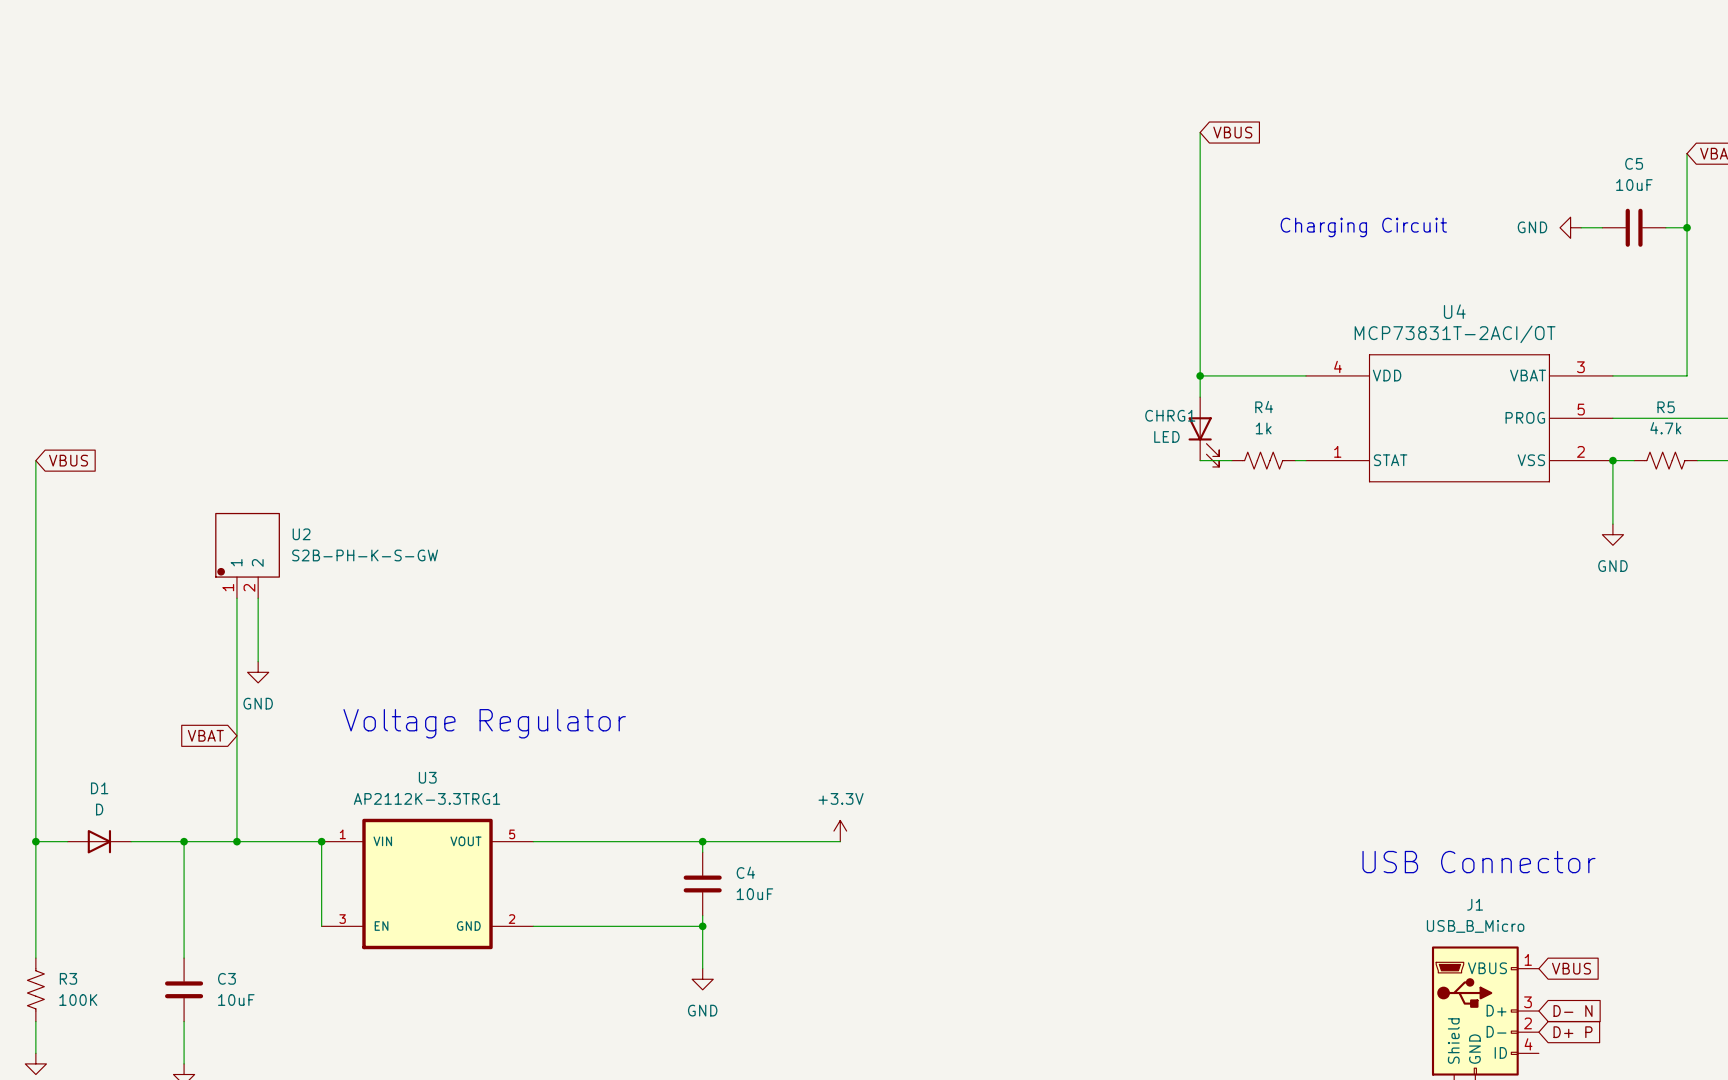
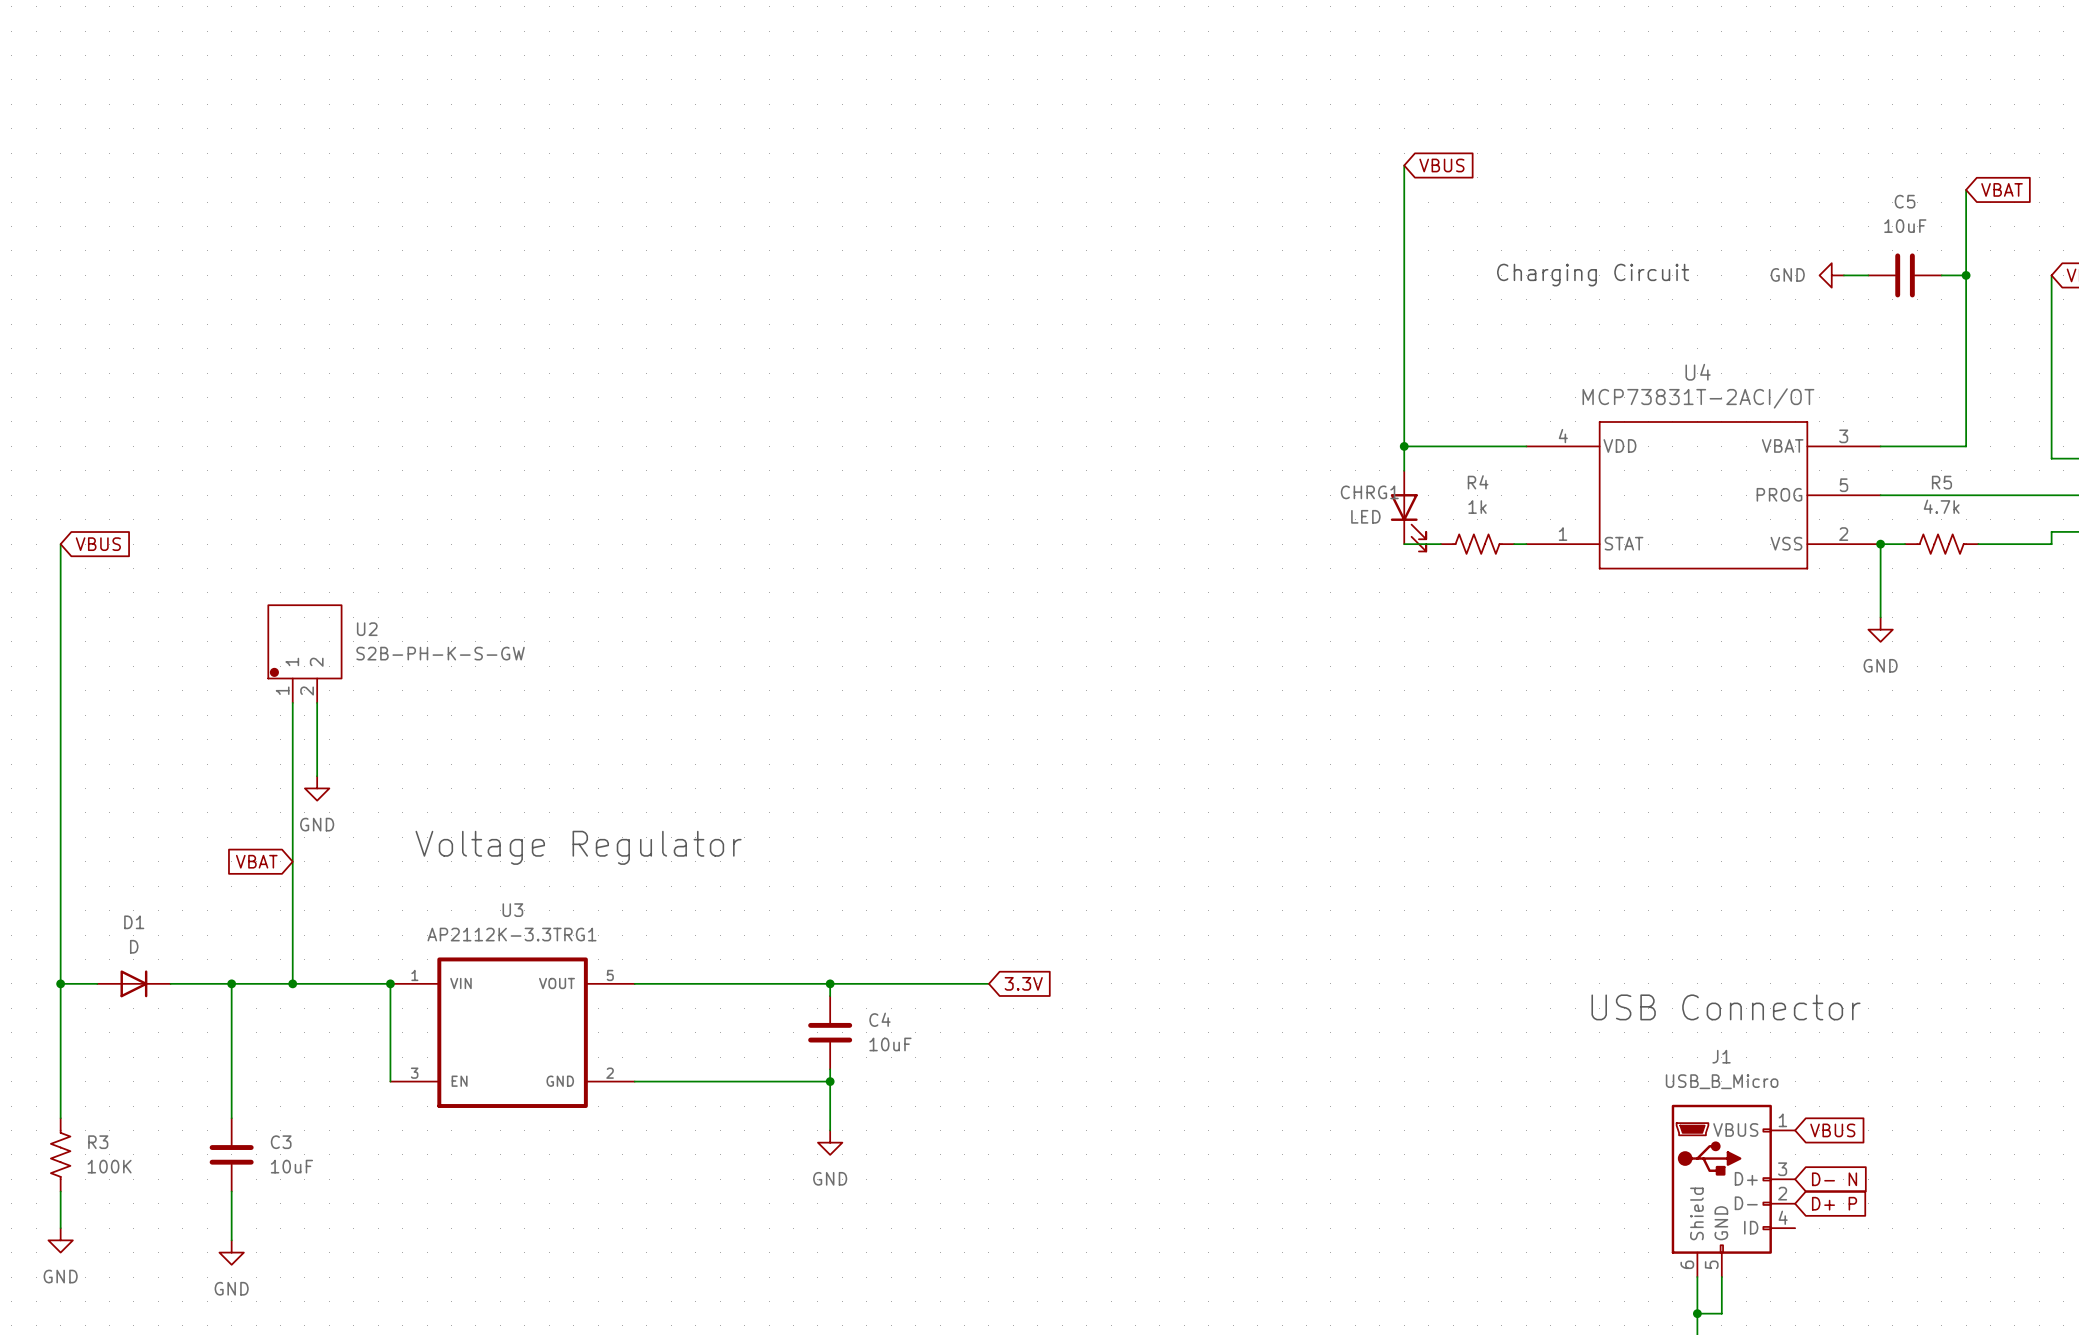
power symbol: +3.3V (840, 831) -> none
global label: none -> 3.3V (1023, 983)

